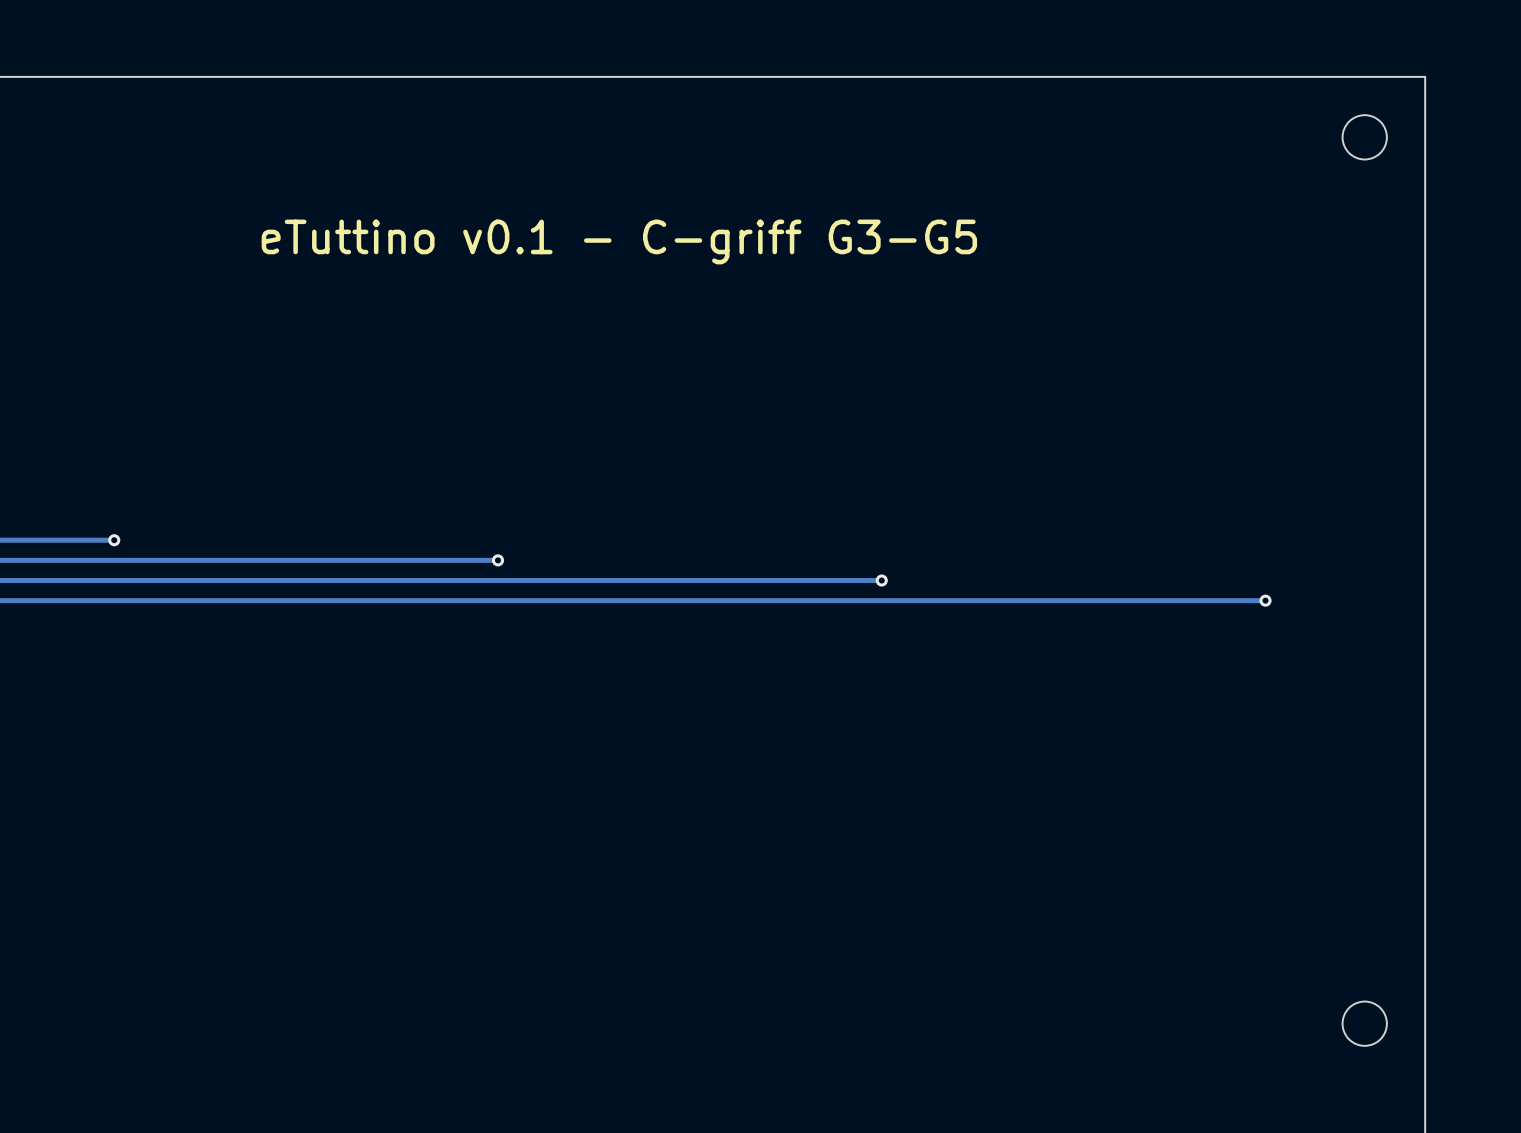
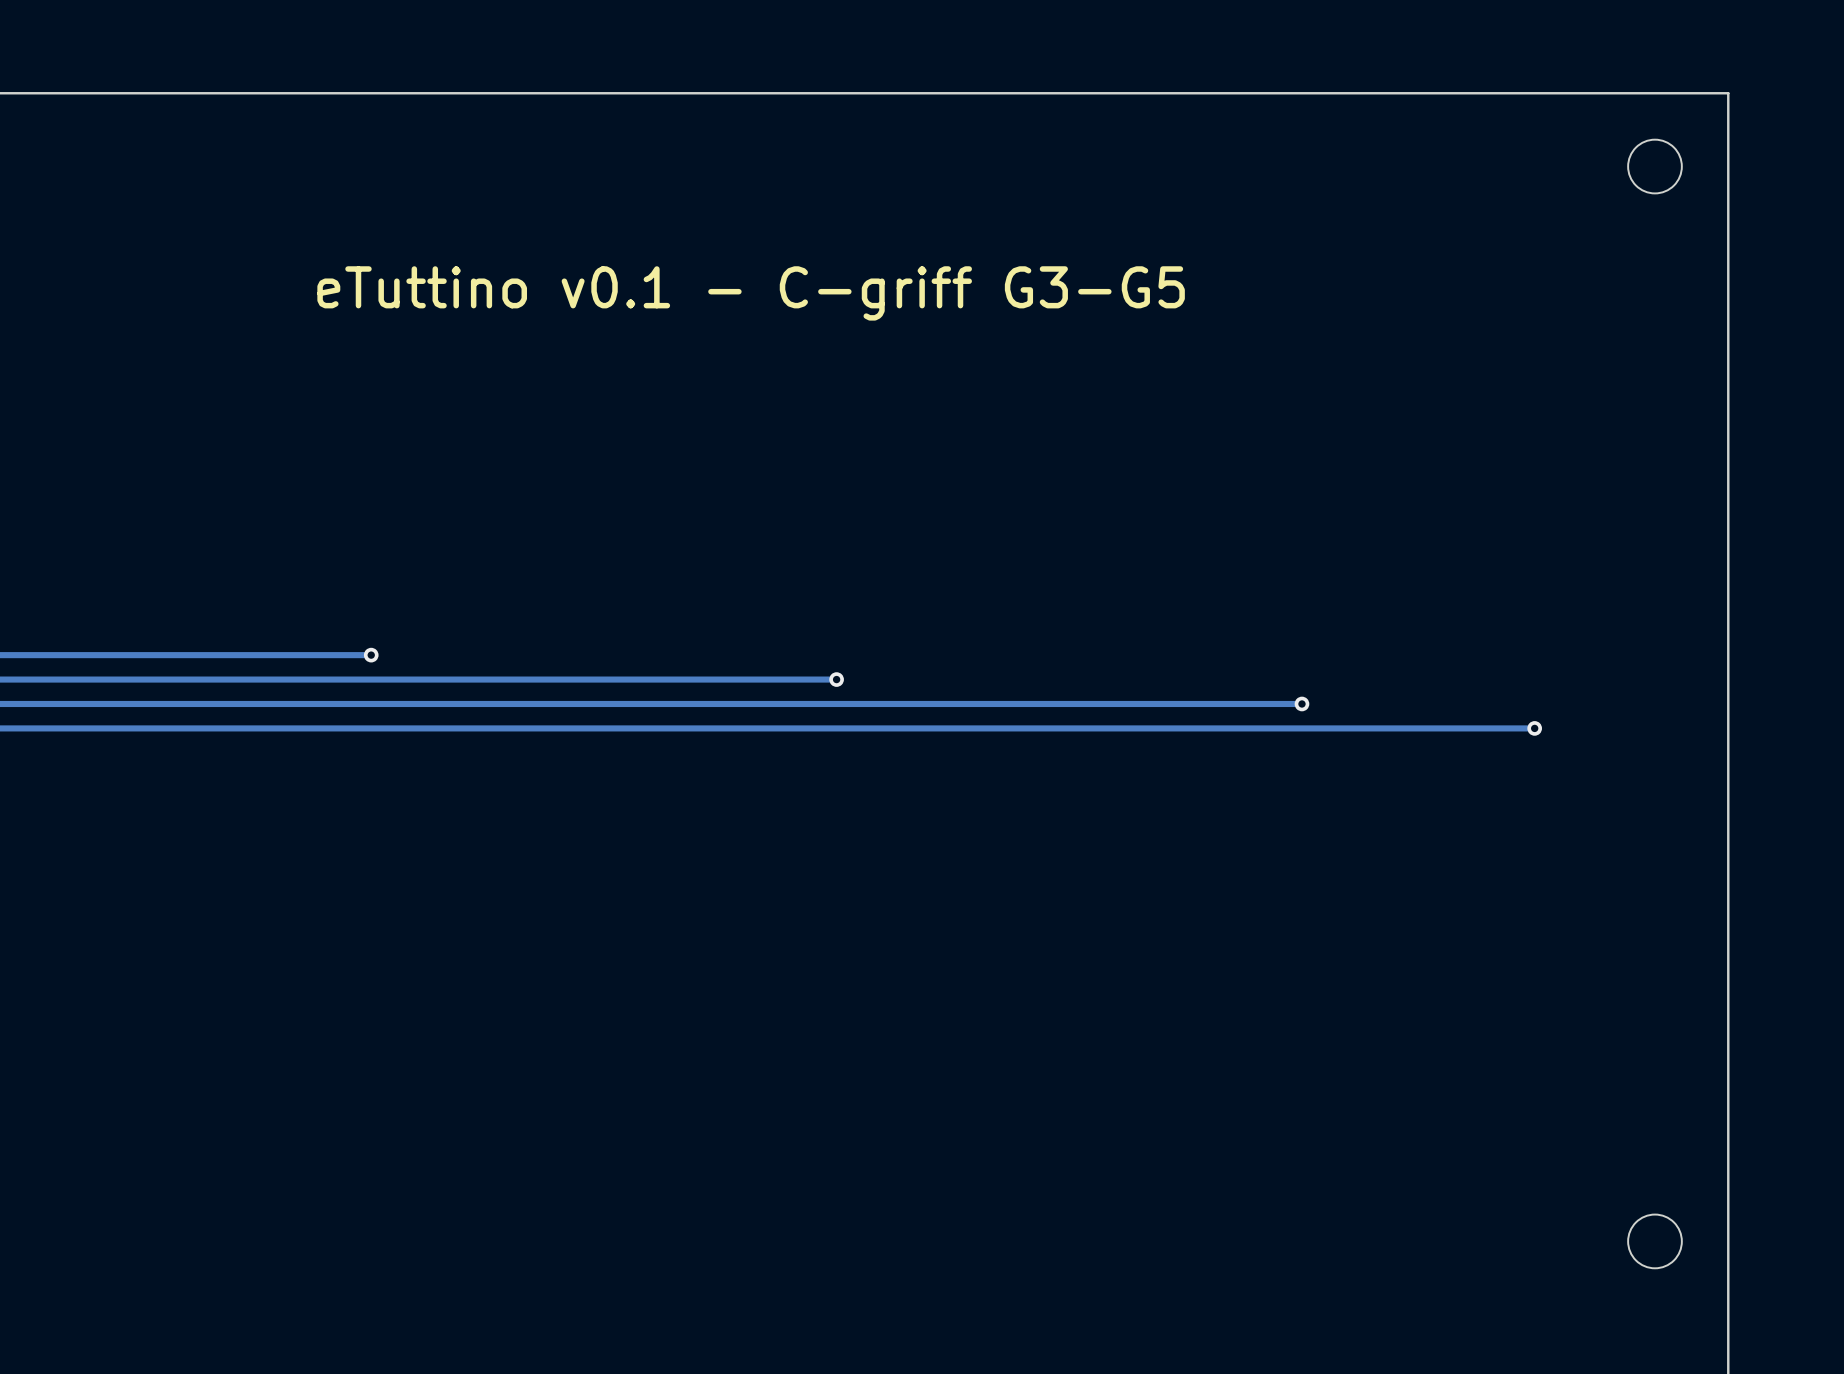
via: (114, 540) -> none
track: none -> (371, 655) (138, 655)
via: none -> (371, 655)
via: (498, 560) -> none
track: none -> (836, 679) (603, 679)
via: none -> (836, 679)
via: (881, 580) -> none
track: none -> (1301, 703) (1069, 703)
via: none -> (1301, 703)

